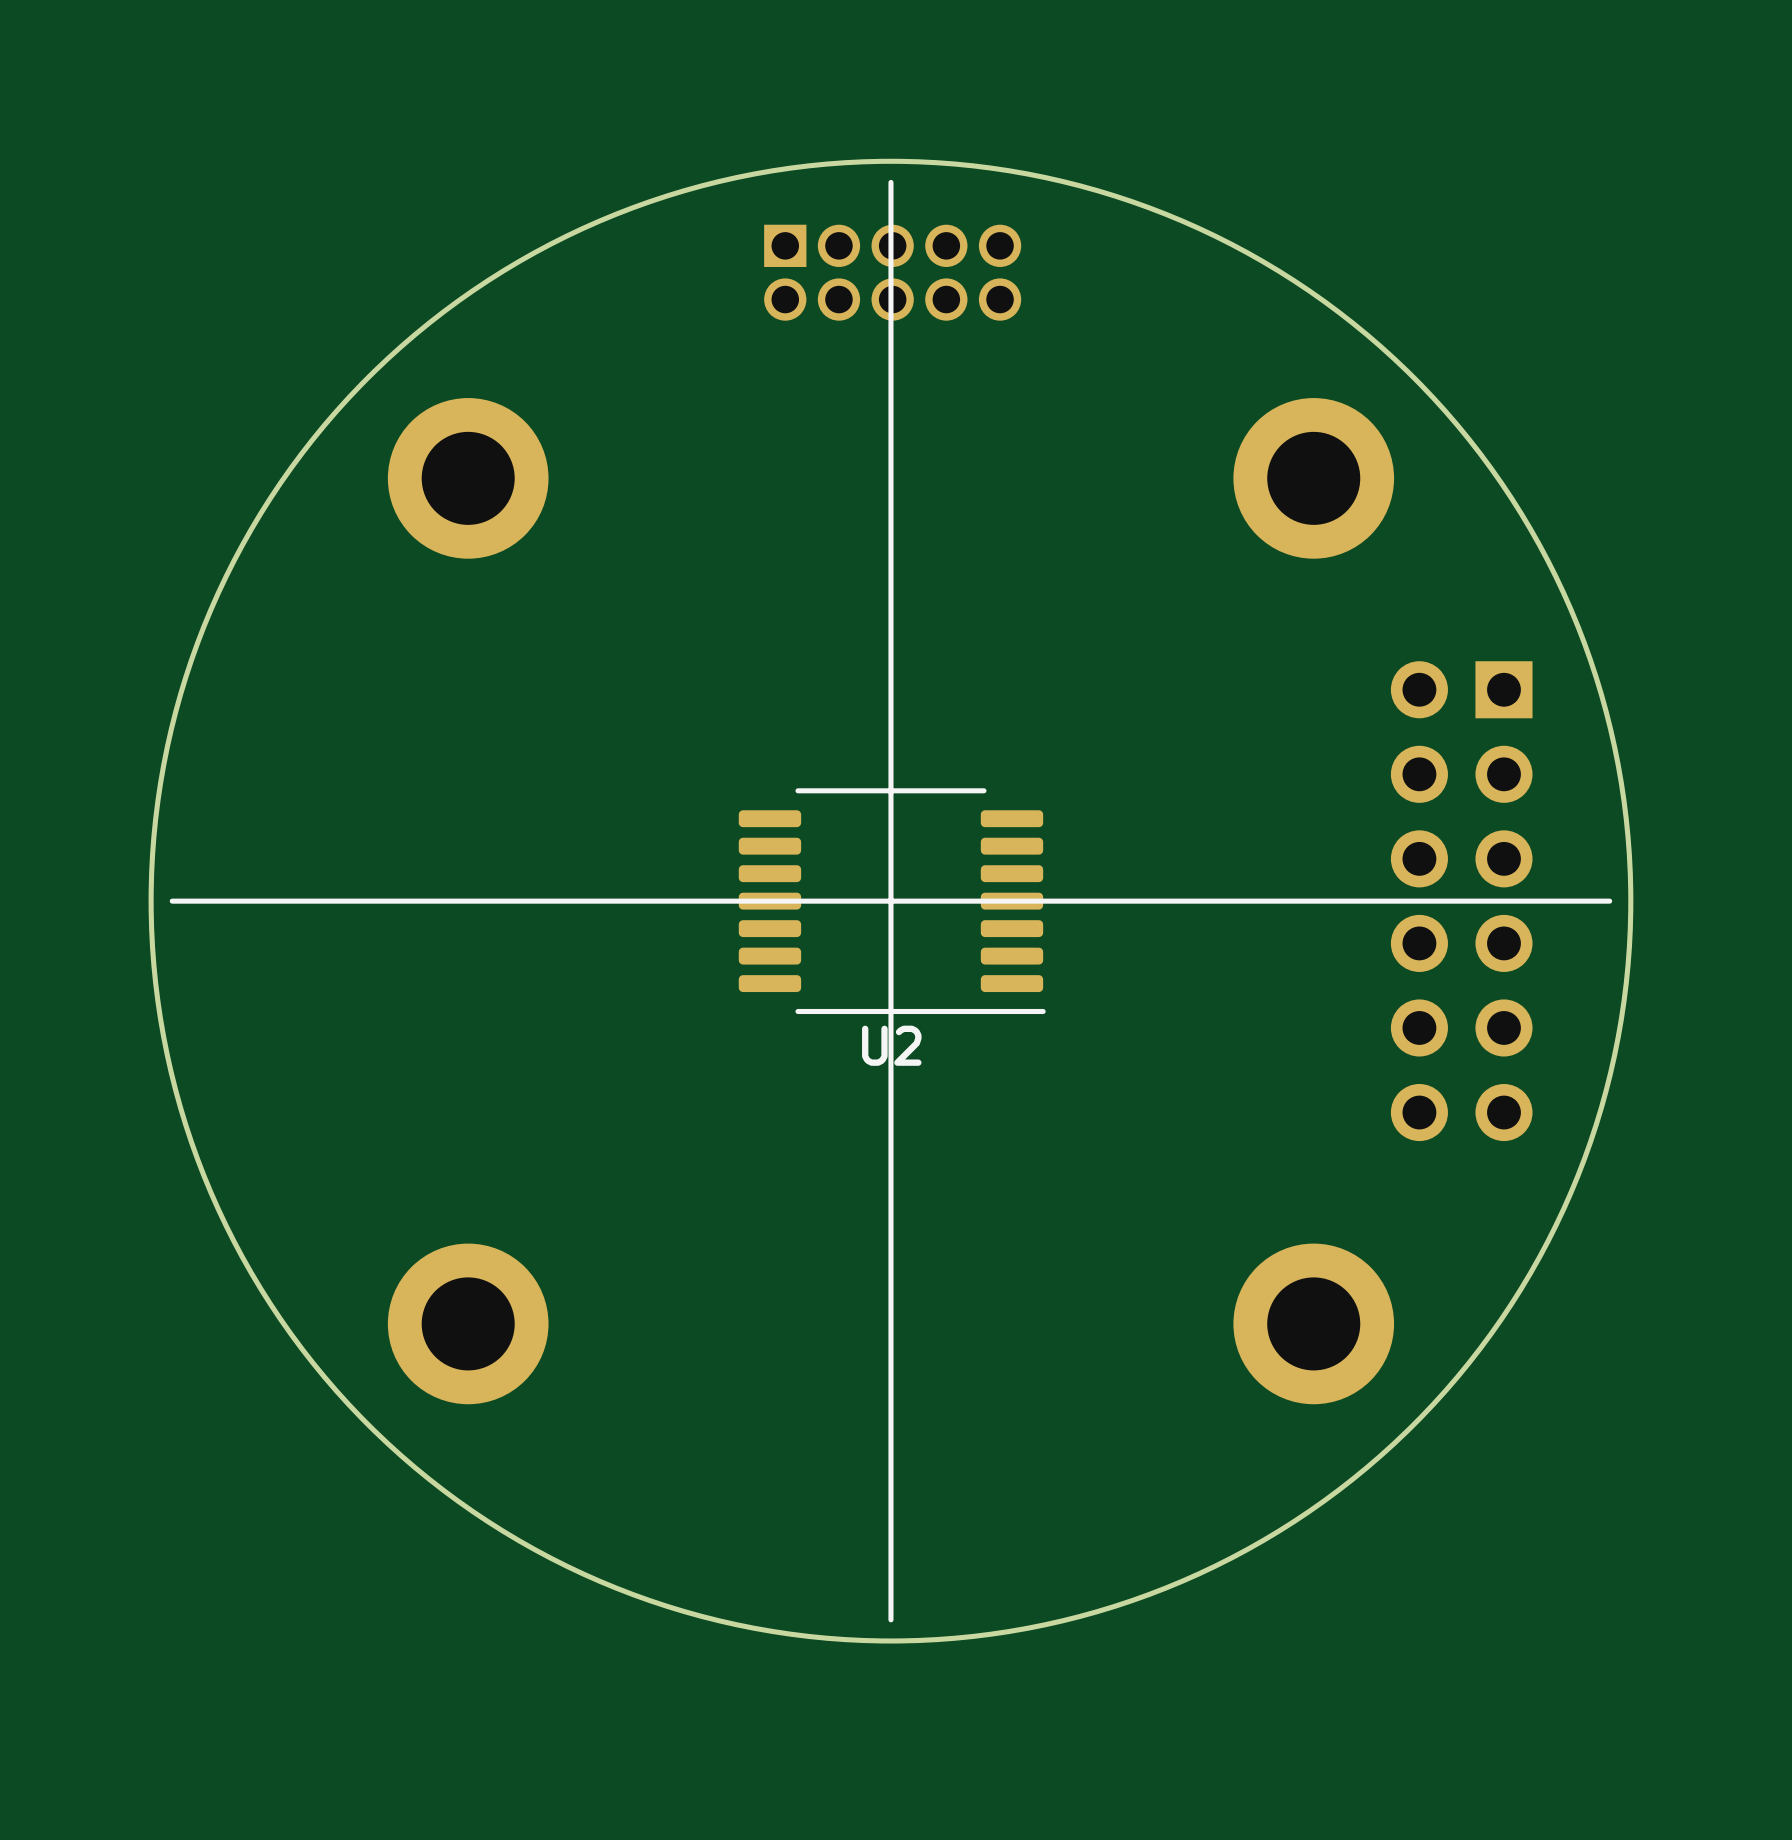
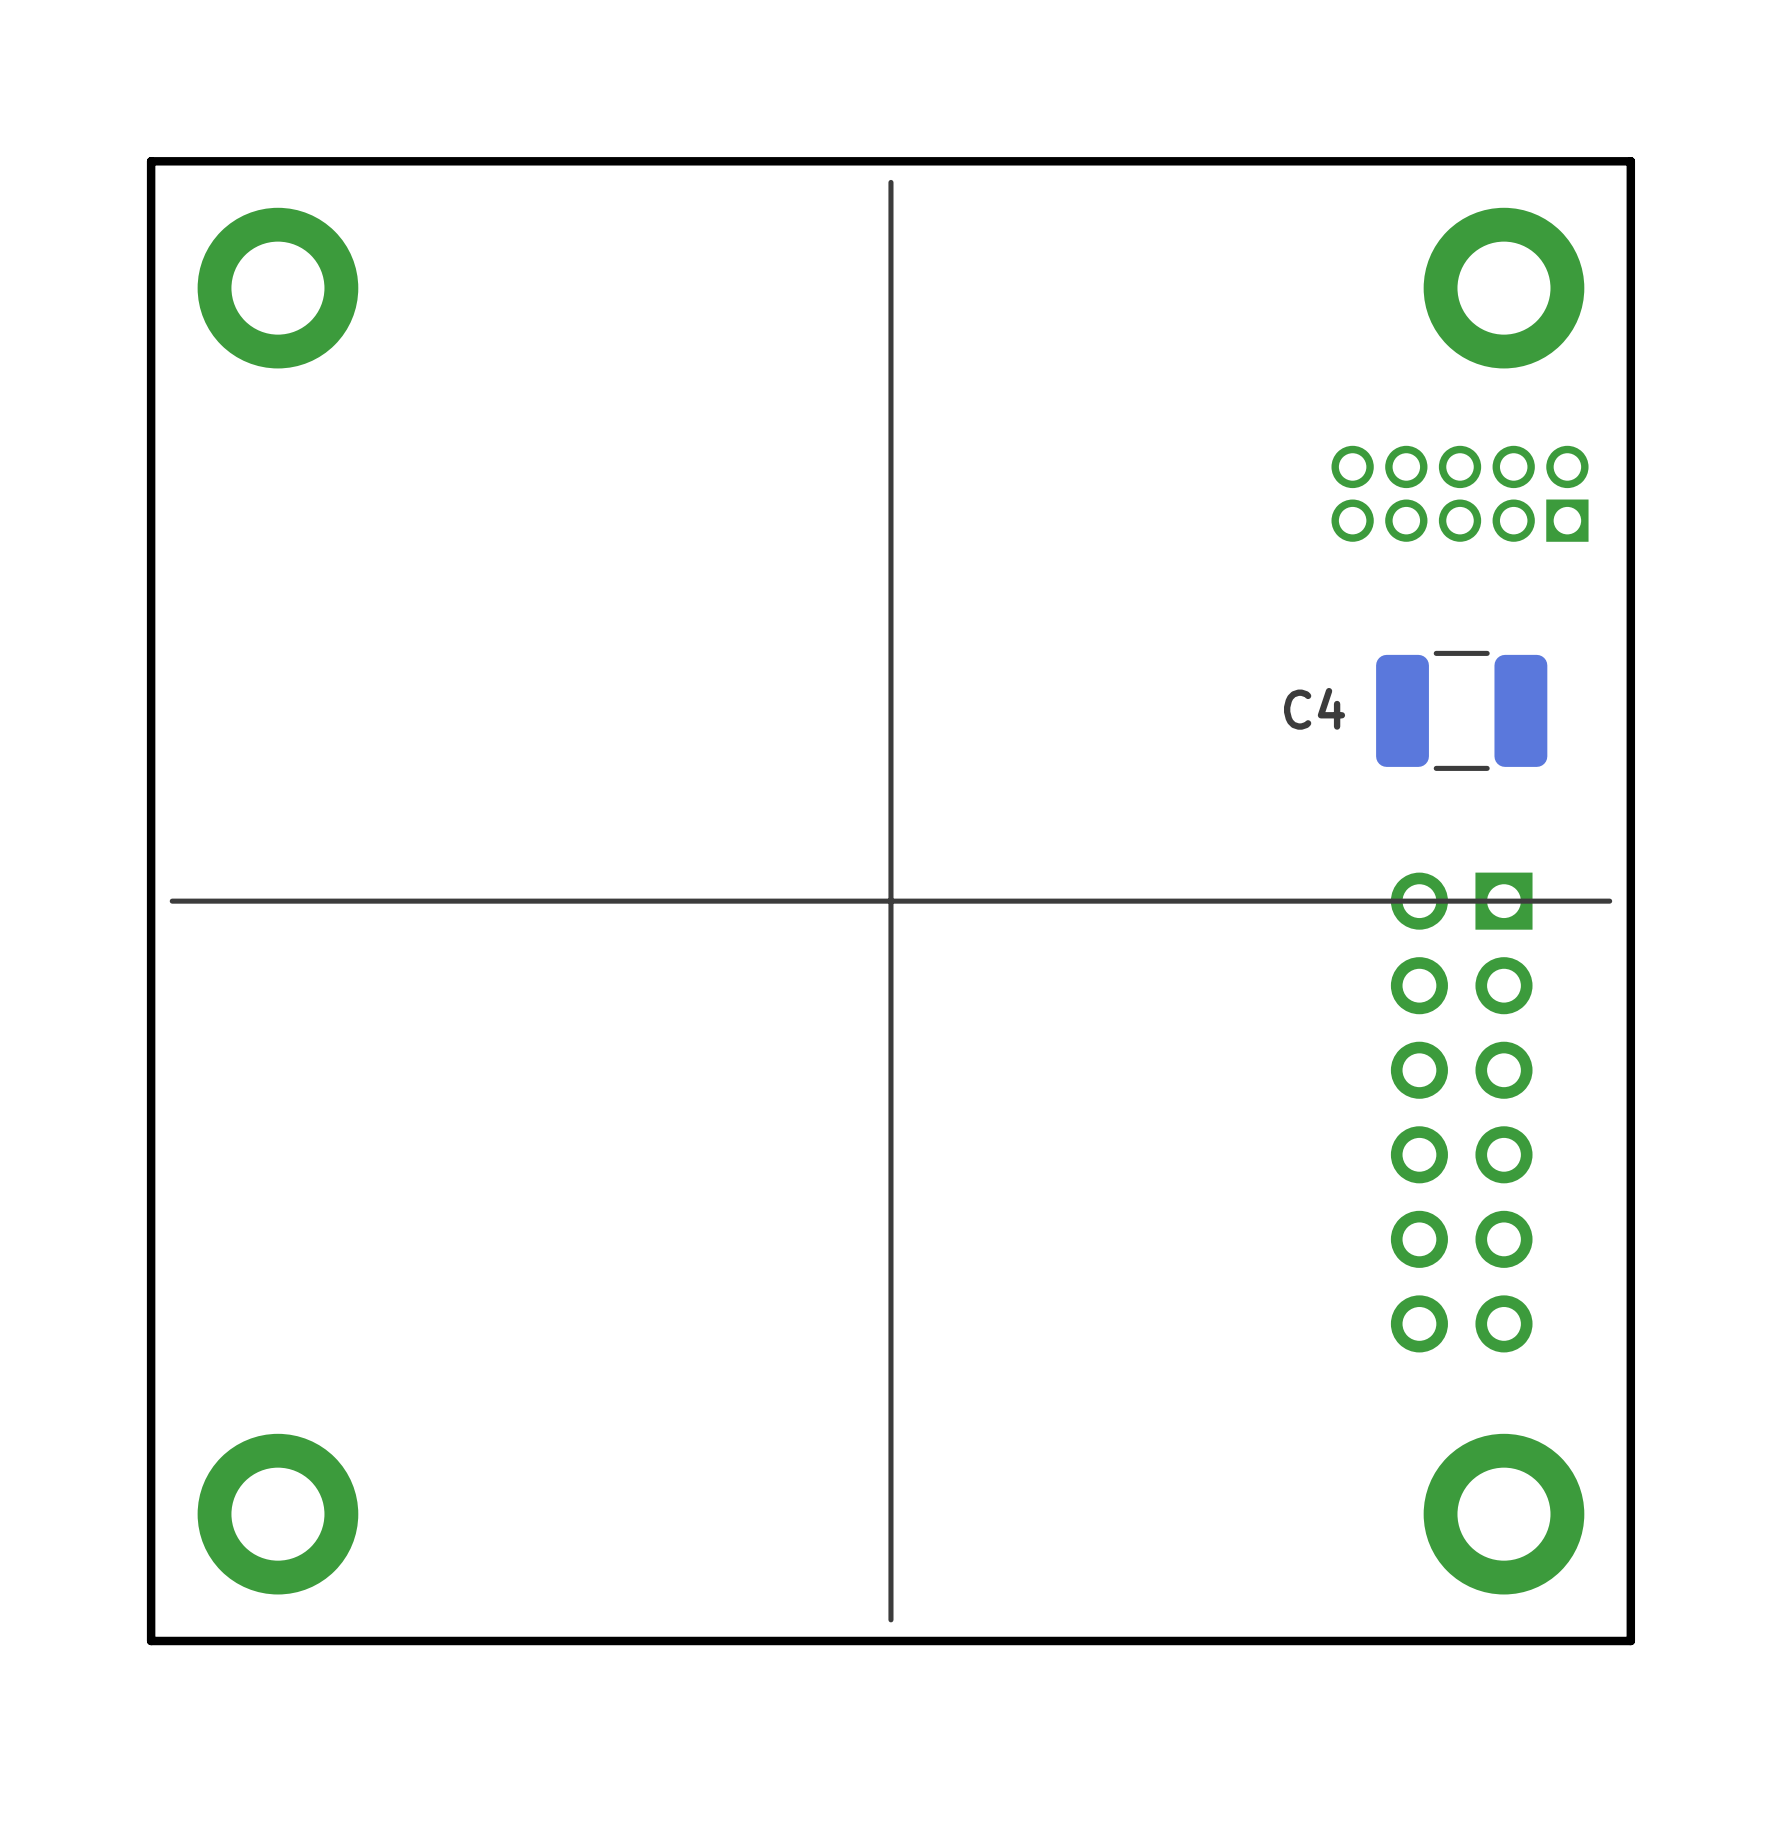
round board edge: [148, 158, 1634, 1644] -> none
board edge: none -> (1630, 161) (1630, 1640) (151, 1640) (151, 161) (1630, 161)
part rotation: 0° (892, 272) -> 180° (1460, 493)
part position: (892, 272) -> (1460, 493)
part position: (468, 478) -> (277, 288)
part position: (1313, 478) -> (1503, 288)
C4: none -> (1461, 710)
U2: (892, 901) -> none
part position: (1461, 901) -> (1461, 1112)
part position: (468, 1323) -> (277, 1514)
part position: (1313, 1323) -> (1503, 1514)

